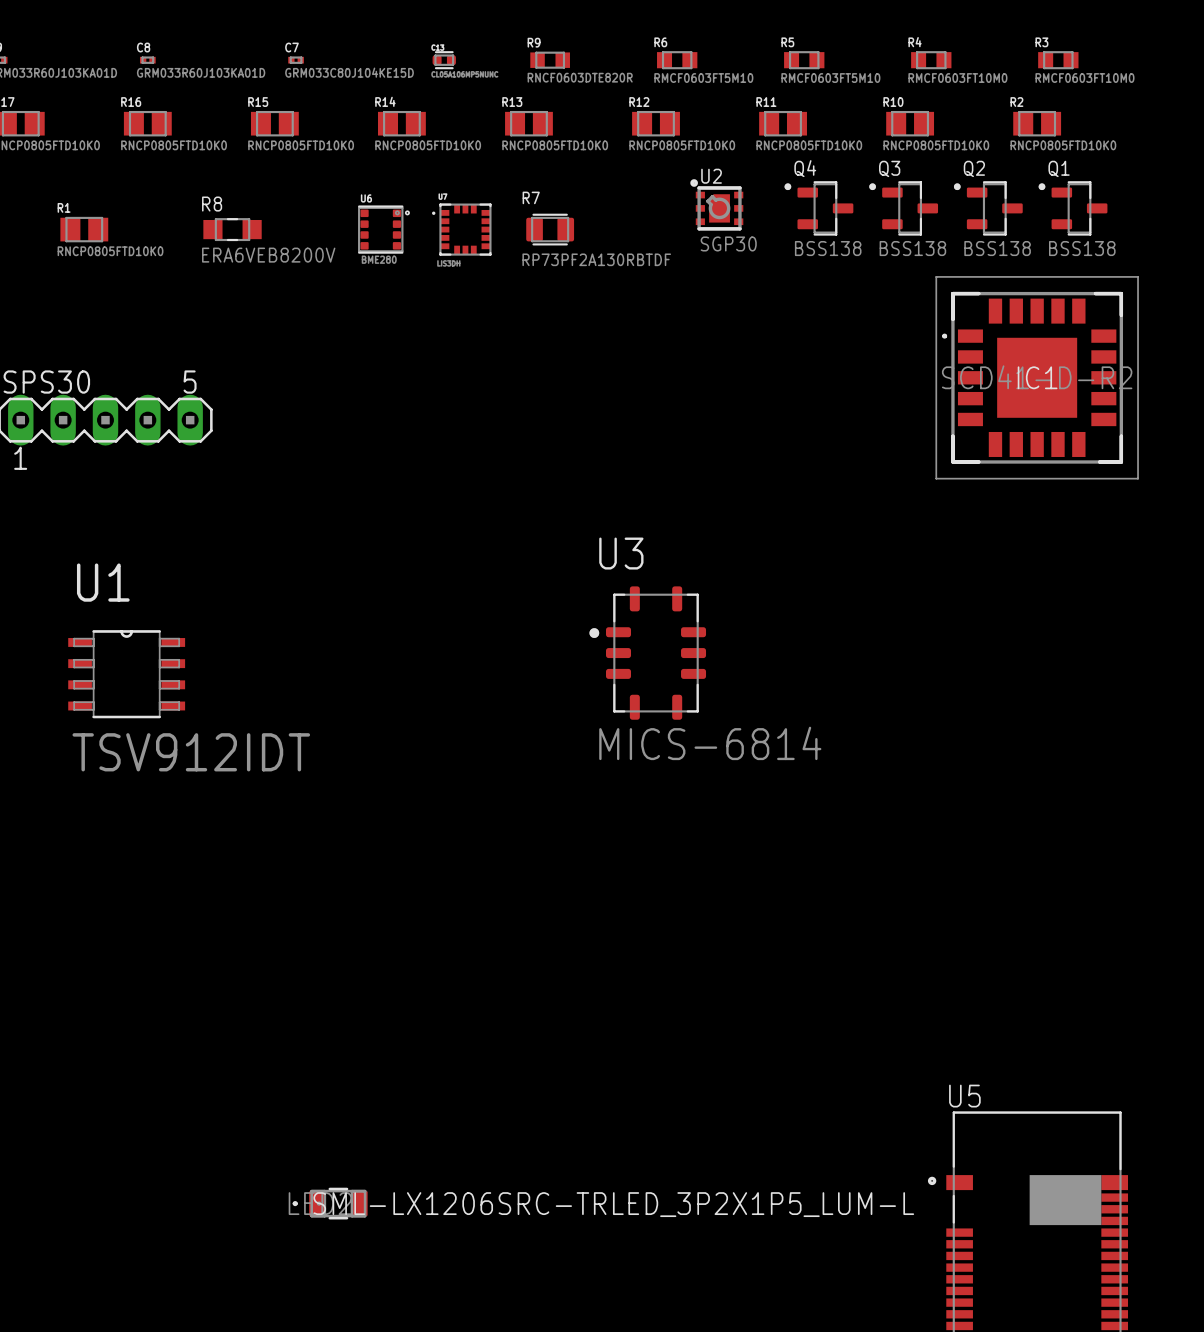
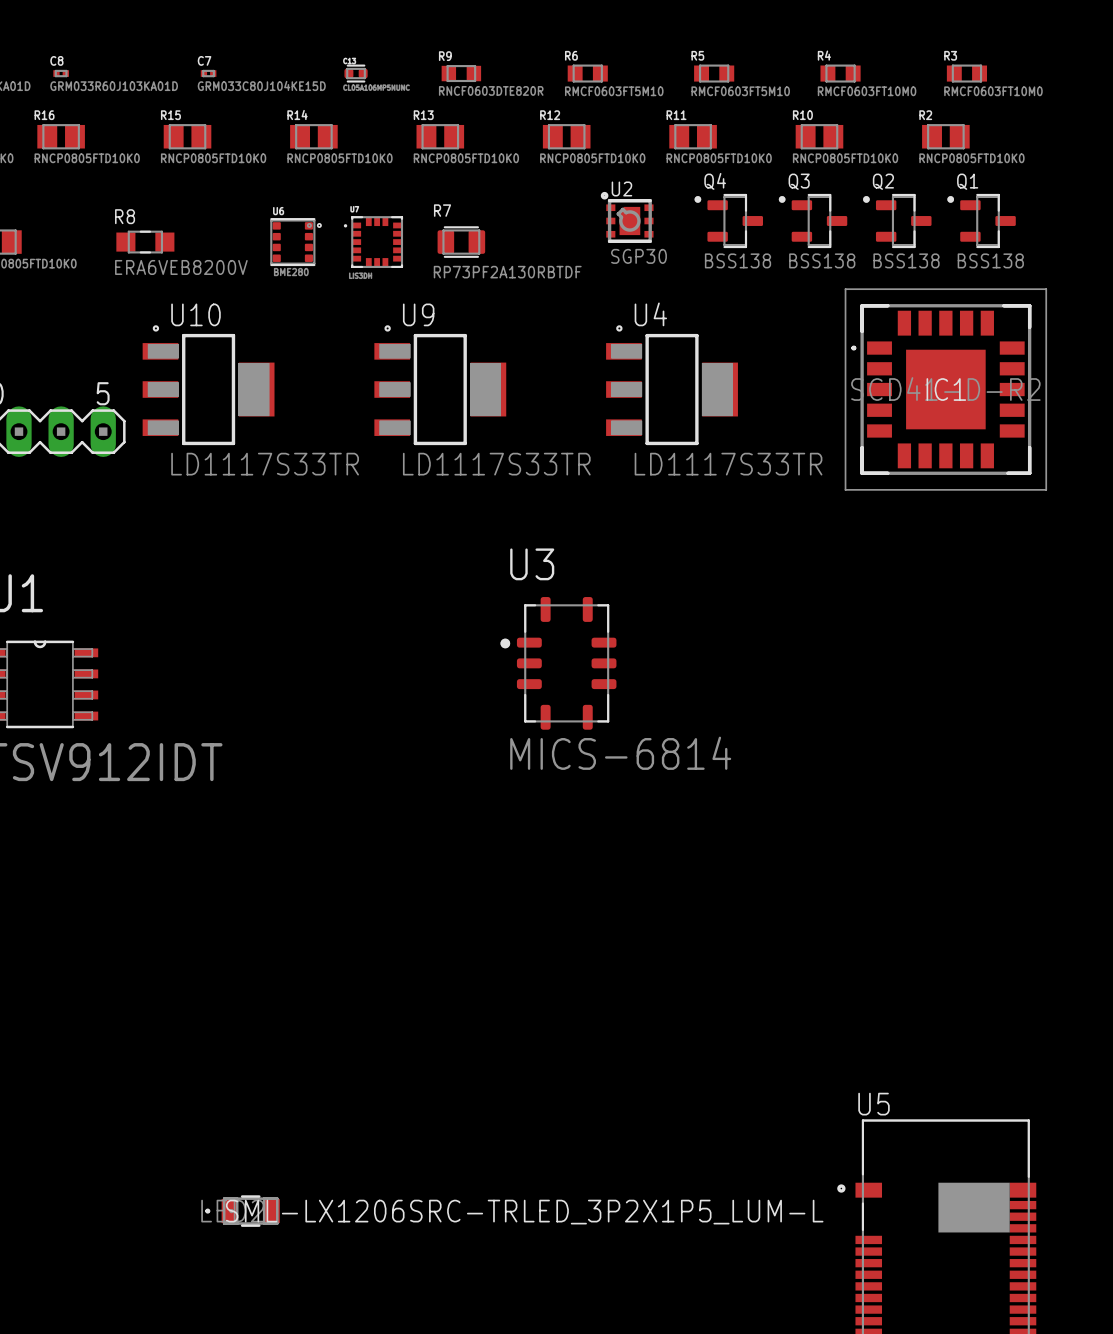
U10: none -> LD1117S33TR (208, 385)
U9: none -> LD1117S33TR (440, 385)
U4: none -> LD1117S33TR (672, 385)

